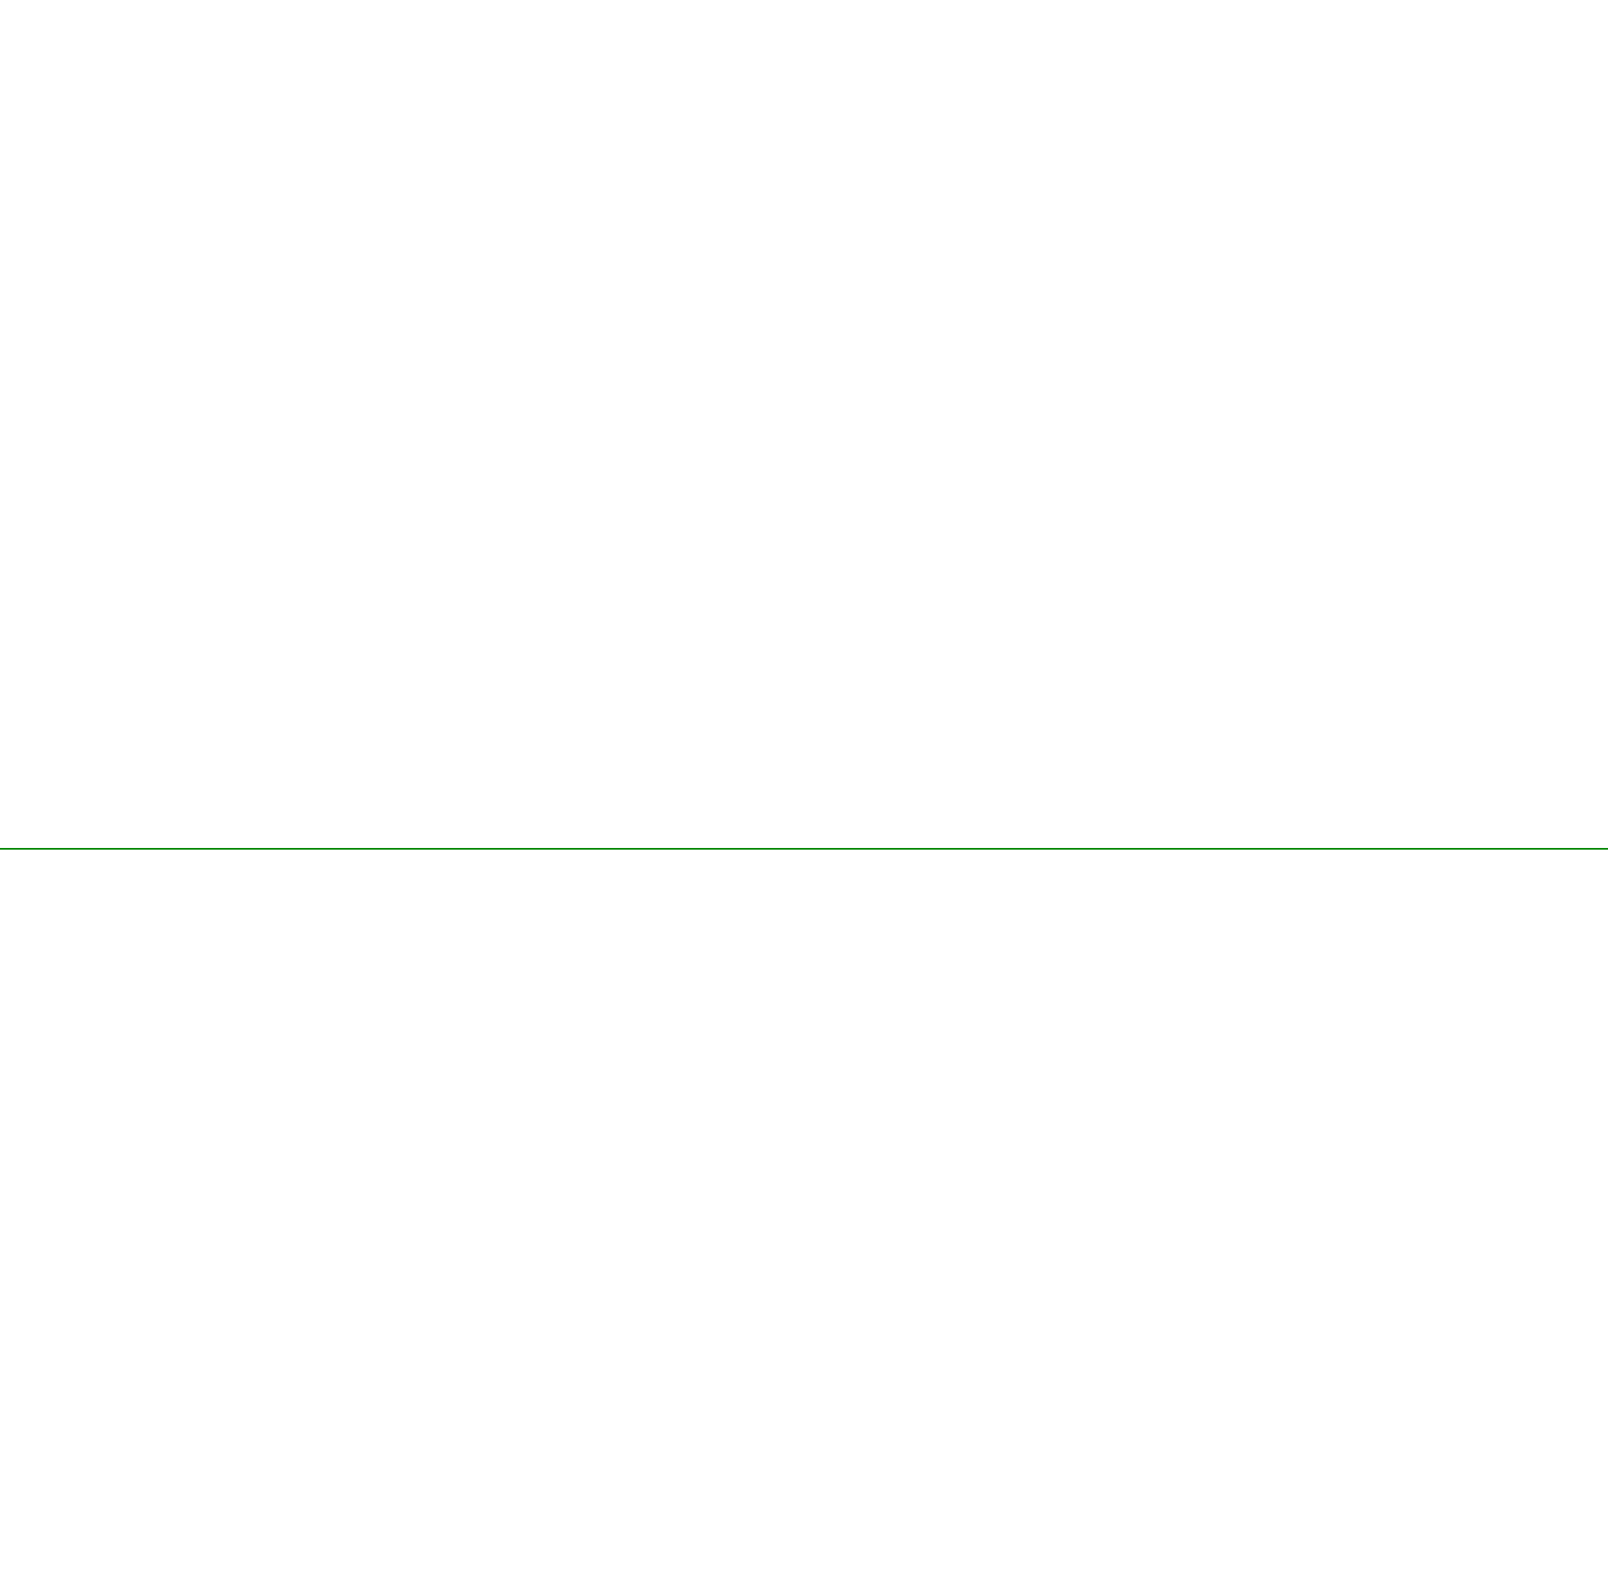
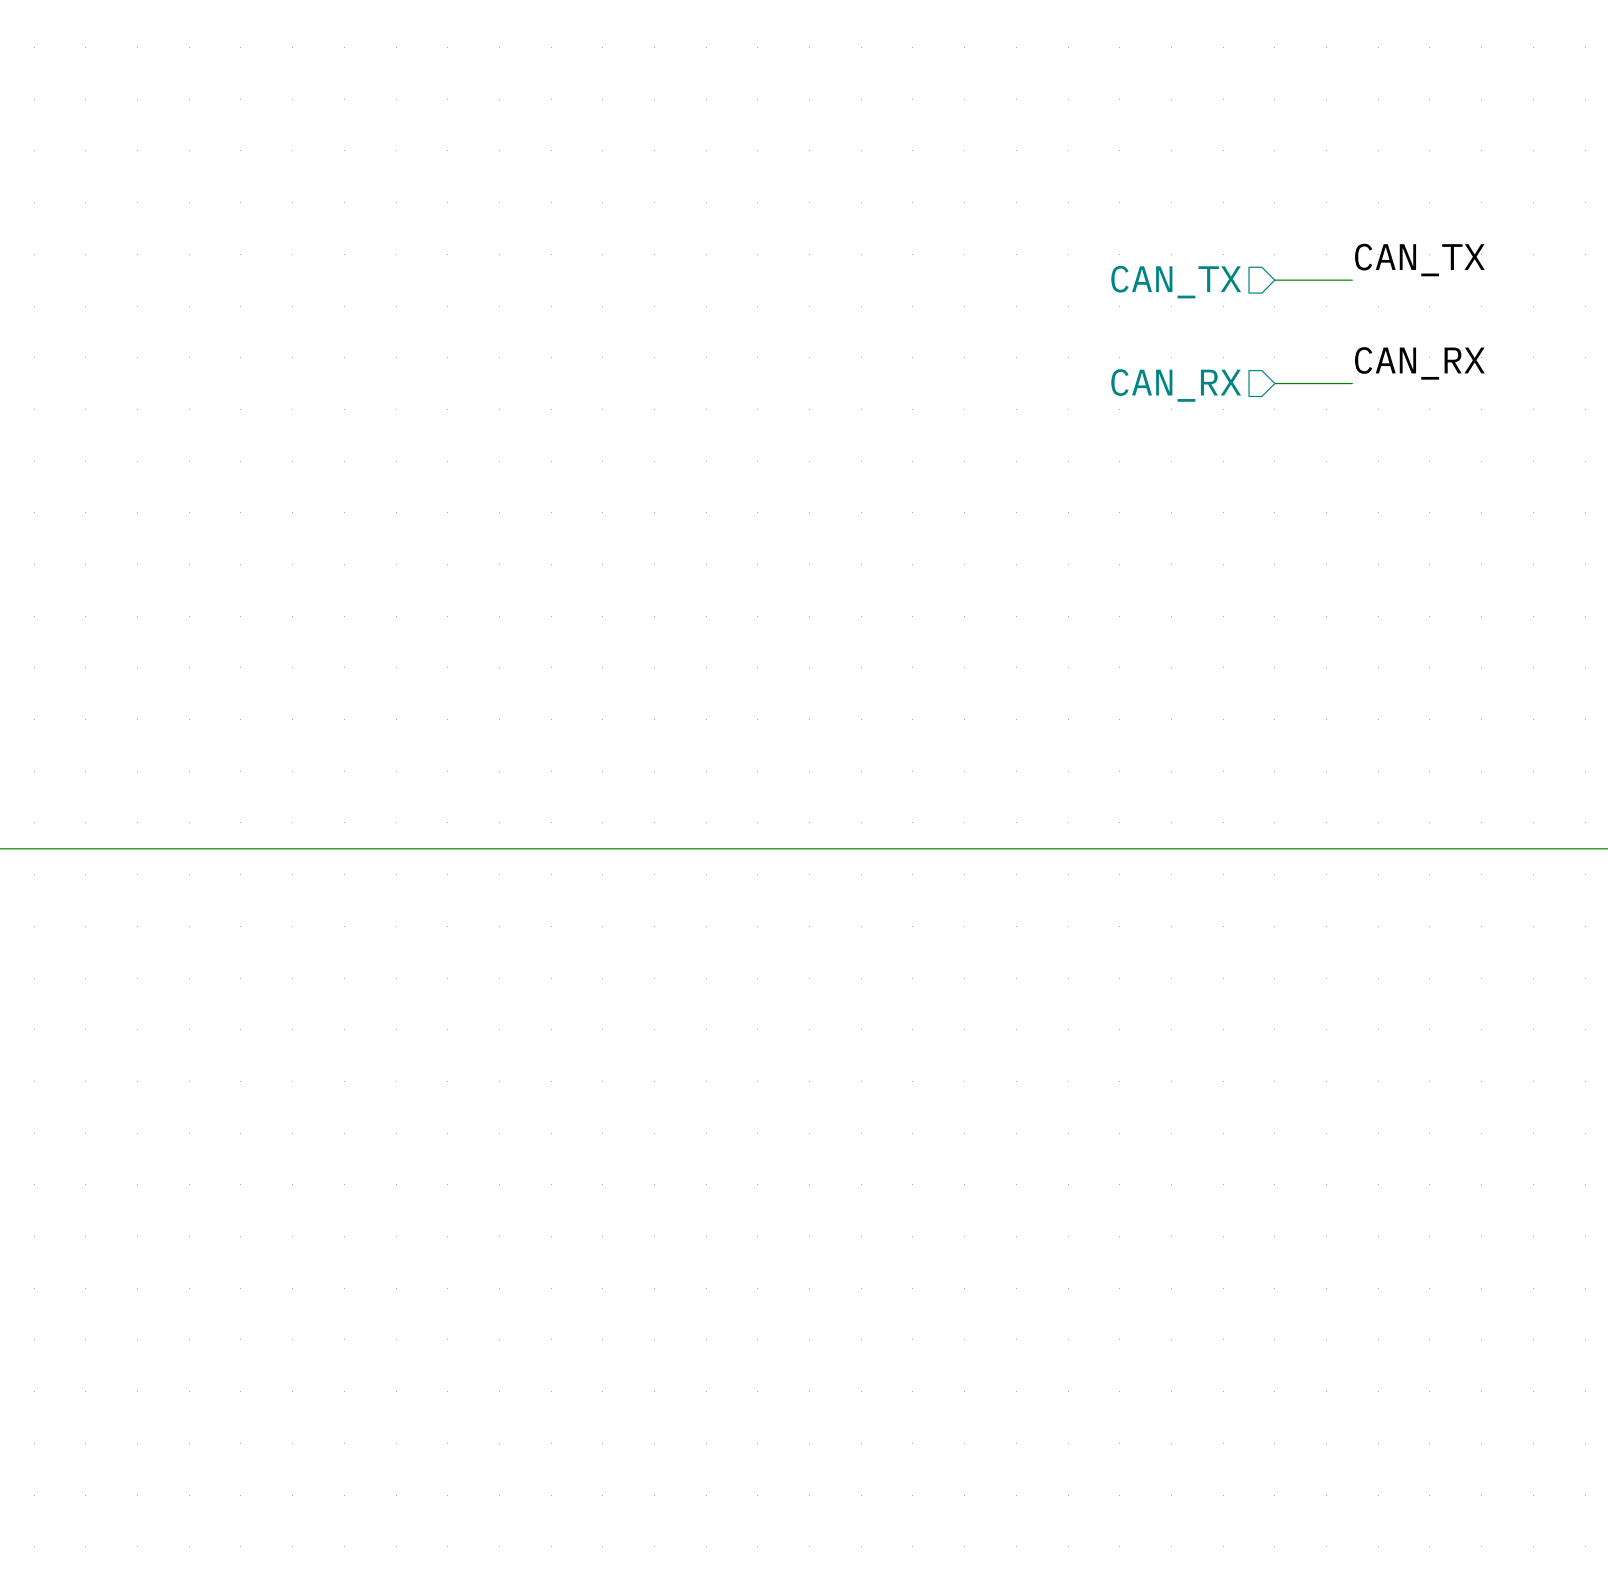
label: none -> CAN_TX (1419, 260)
sheet pin: none -> CAN_TX (1176, 282)
wire: none -> (1274, 280) (1352, 280)
label: none -> CAN_RX (1419, 363)
sheet pin: none -> CAN_RX (1176, 385)
wire: none -> (1274, 383) (1352, 383)

